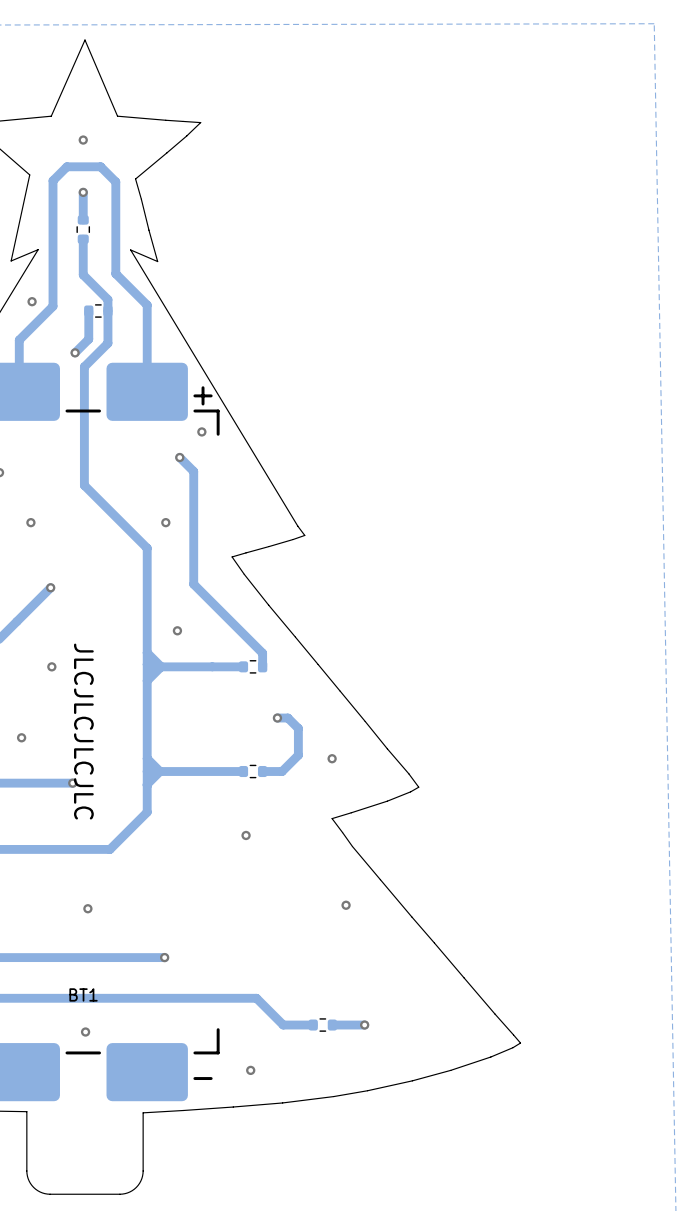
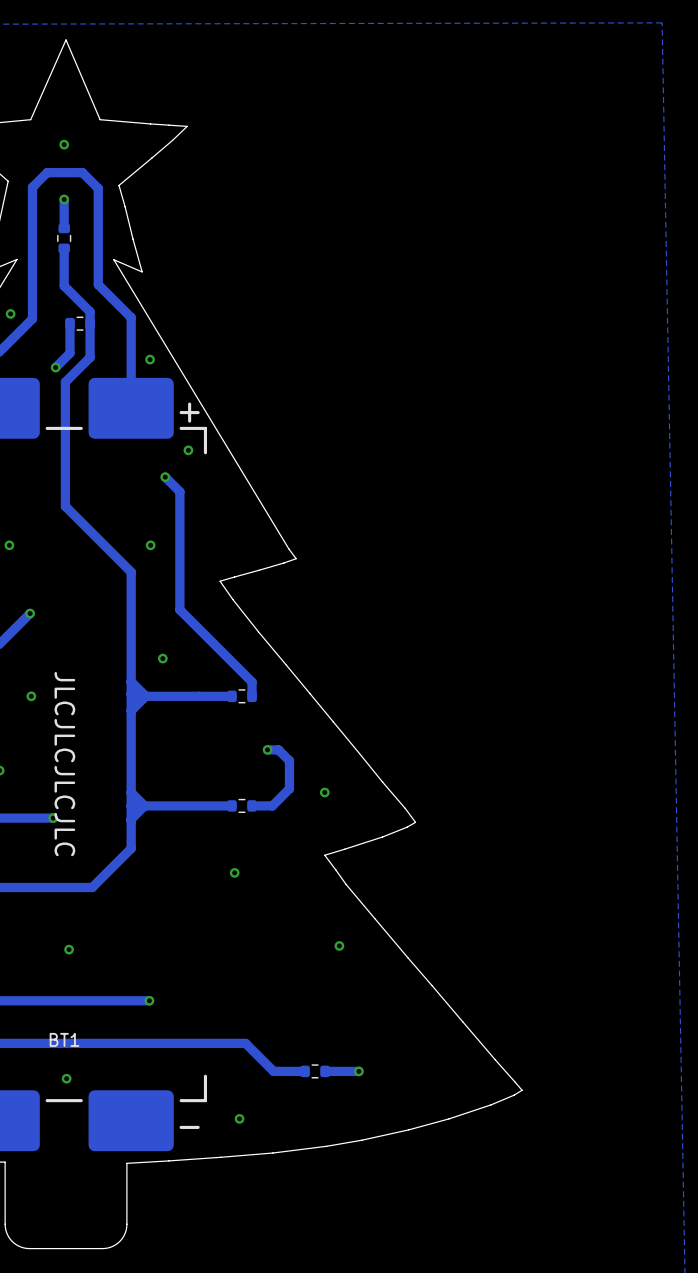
via: none -> (150, 359)

